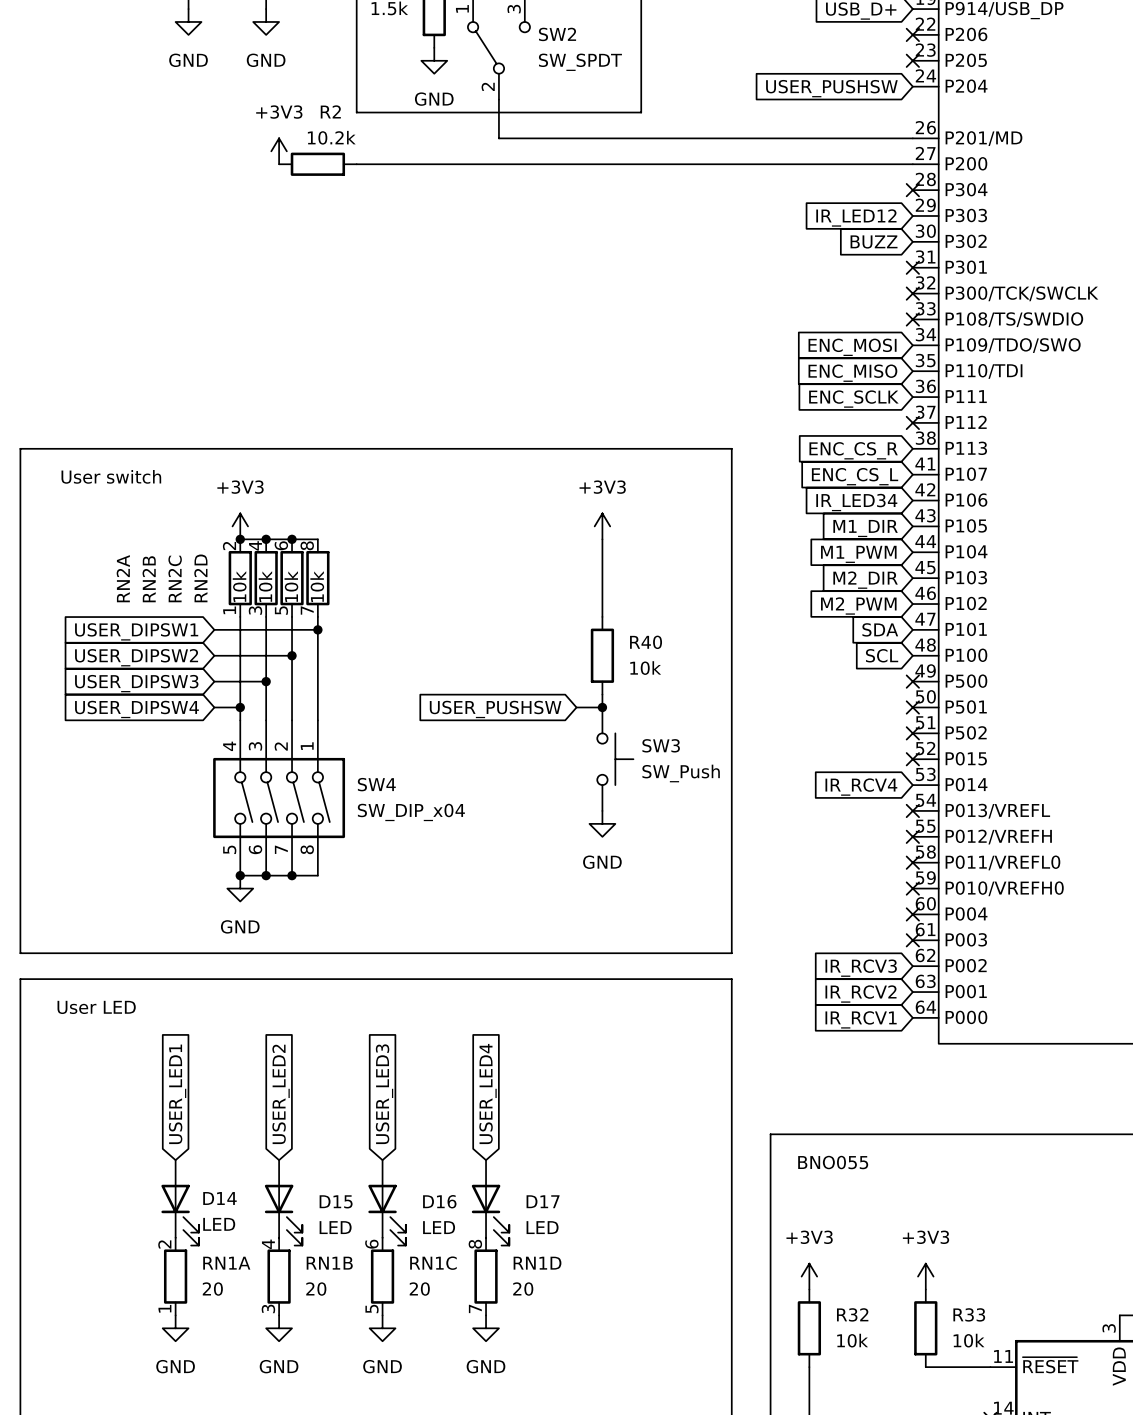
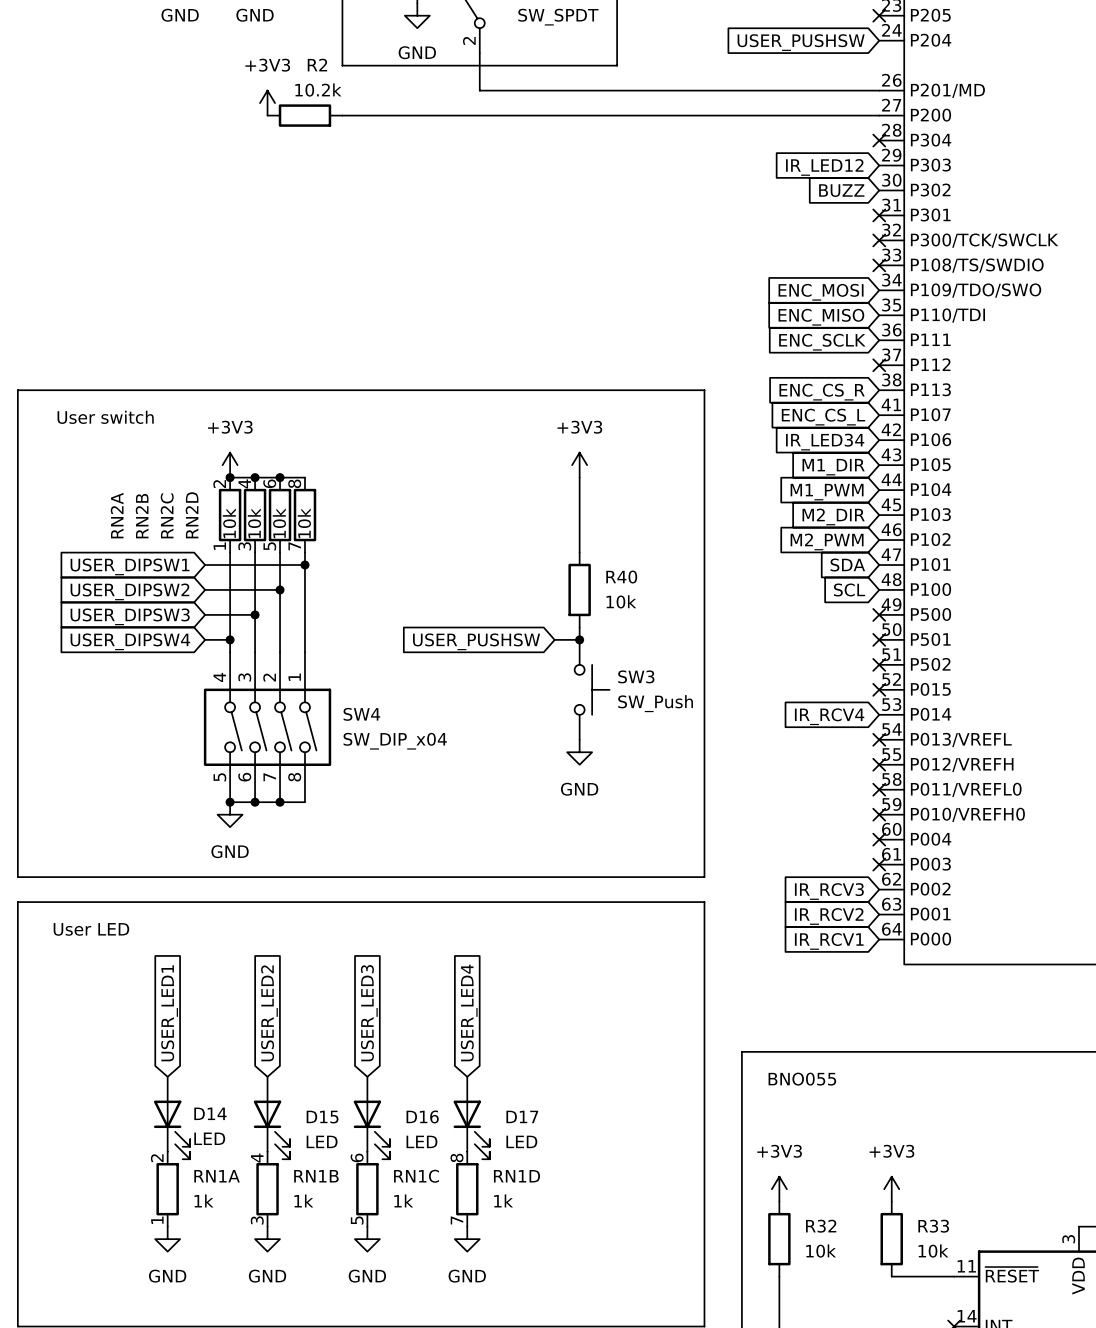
RN1A value: 20 (212, 1289) -> 1k (203, 1200)
RN1B value: 20 (316, 1289) -> 1k (303, 1200)
RN1C value: 20 (419, 1289) -> 1k (403, 1200)
RN1D value: 20 (523, 1289) -> 1k (503, 1200)

